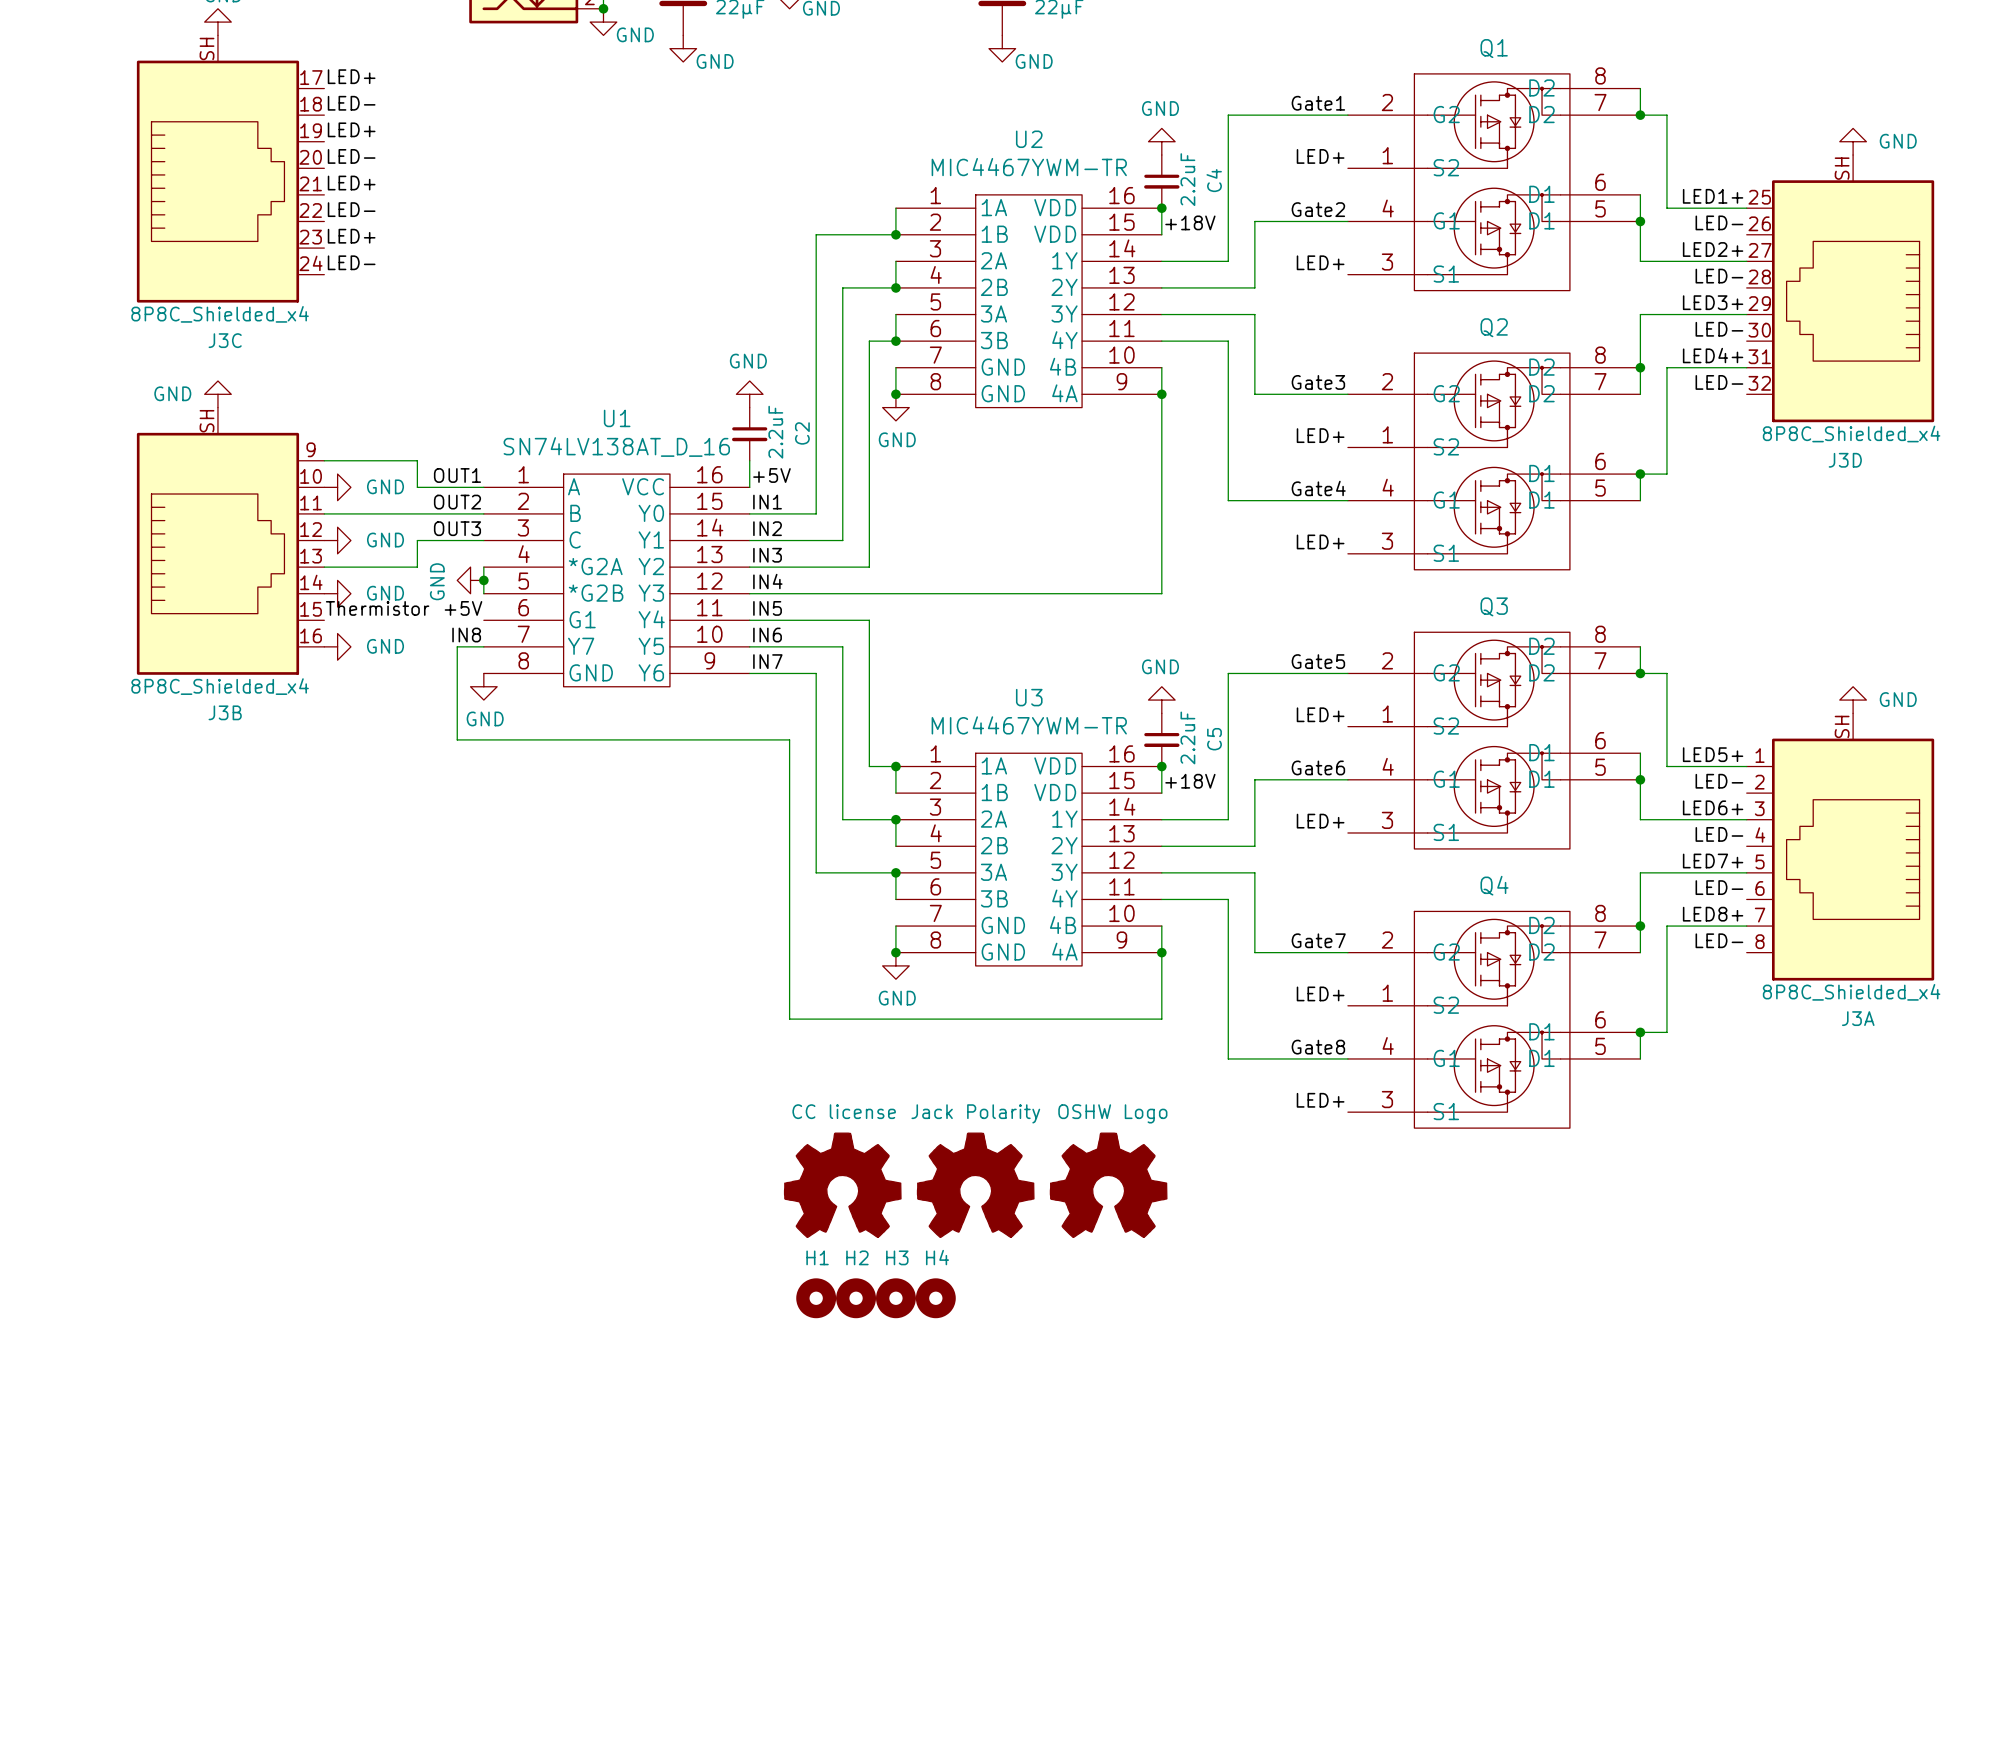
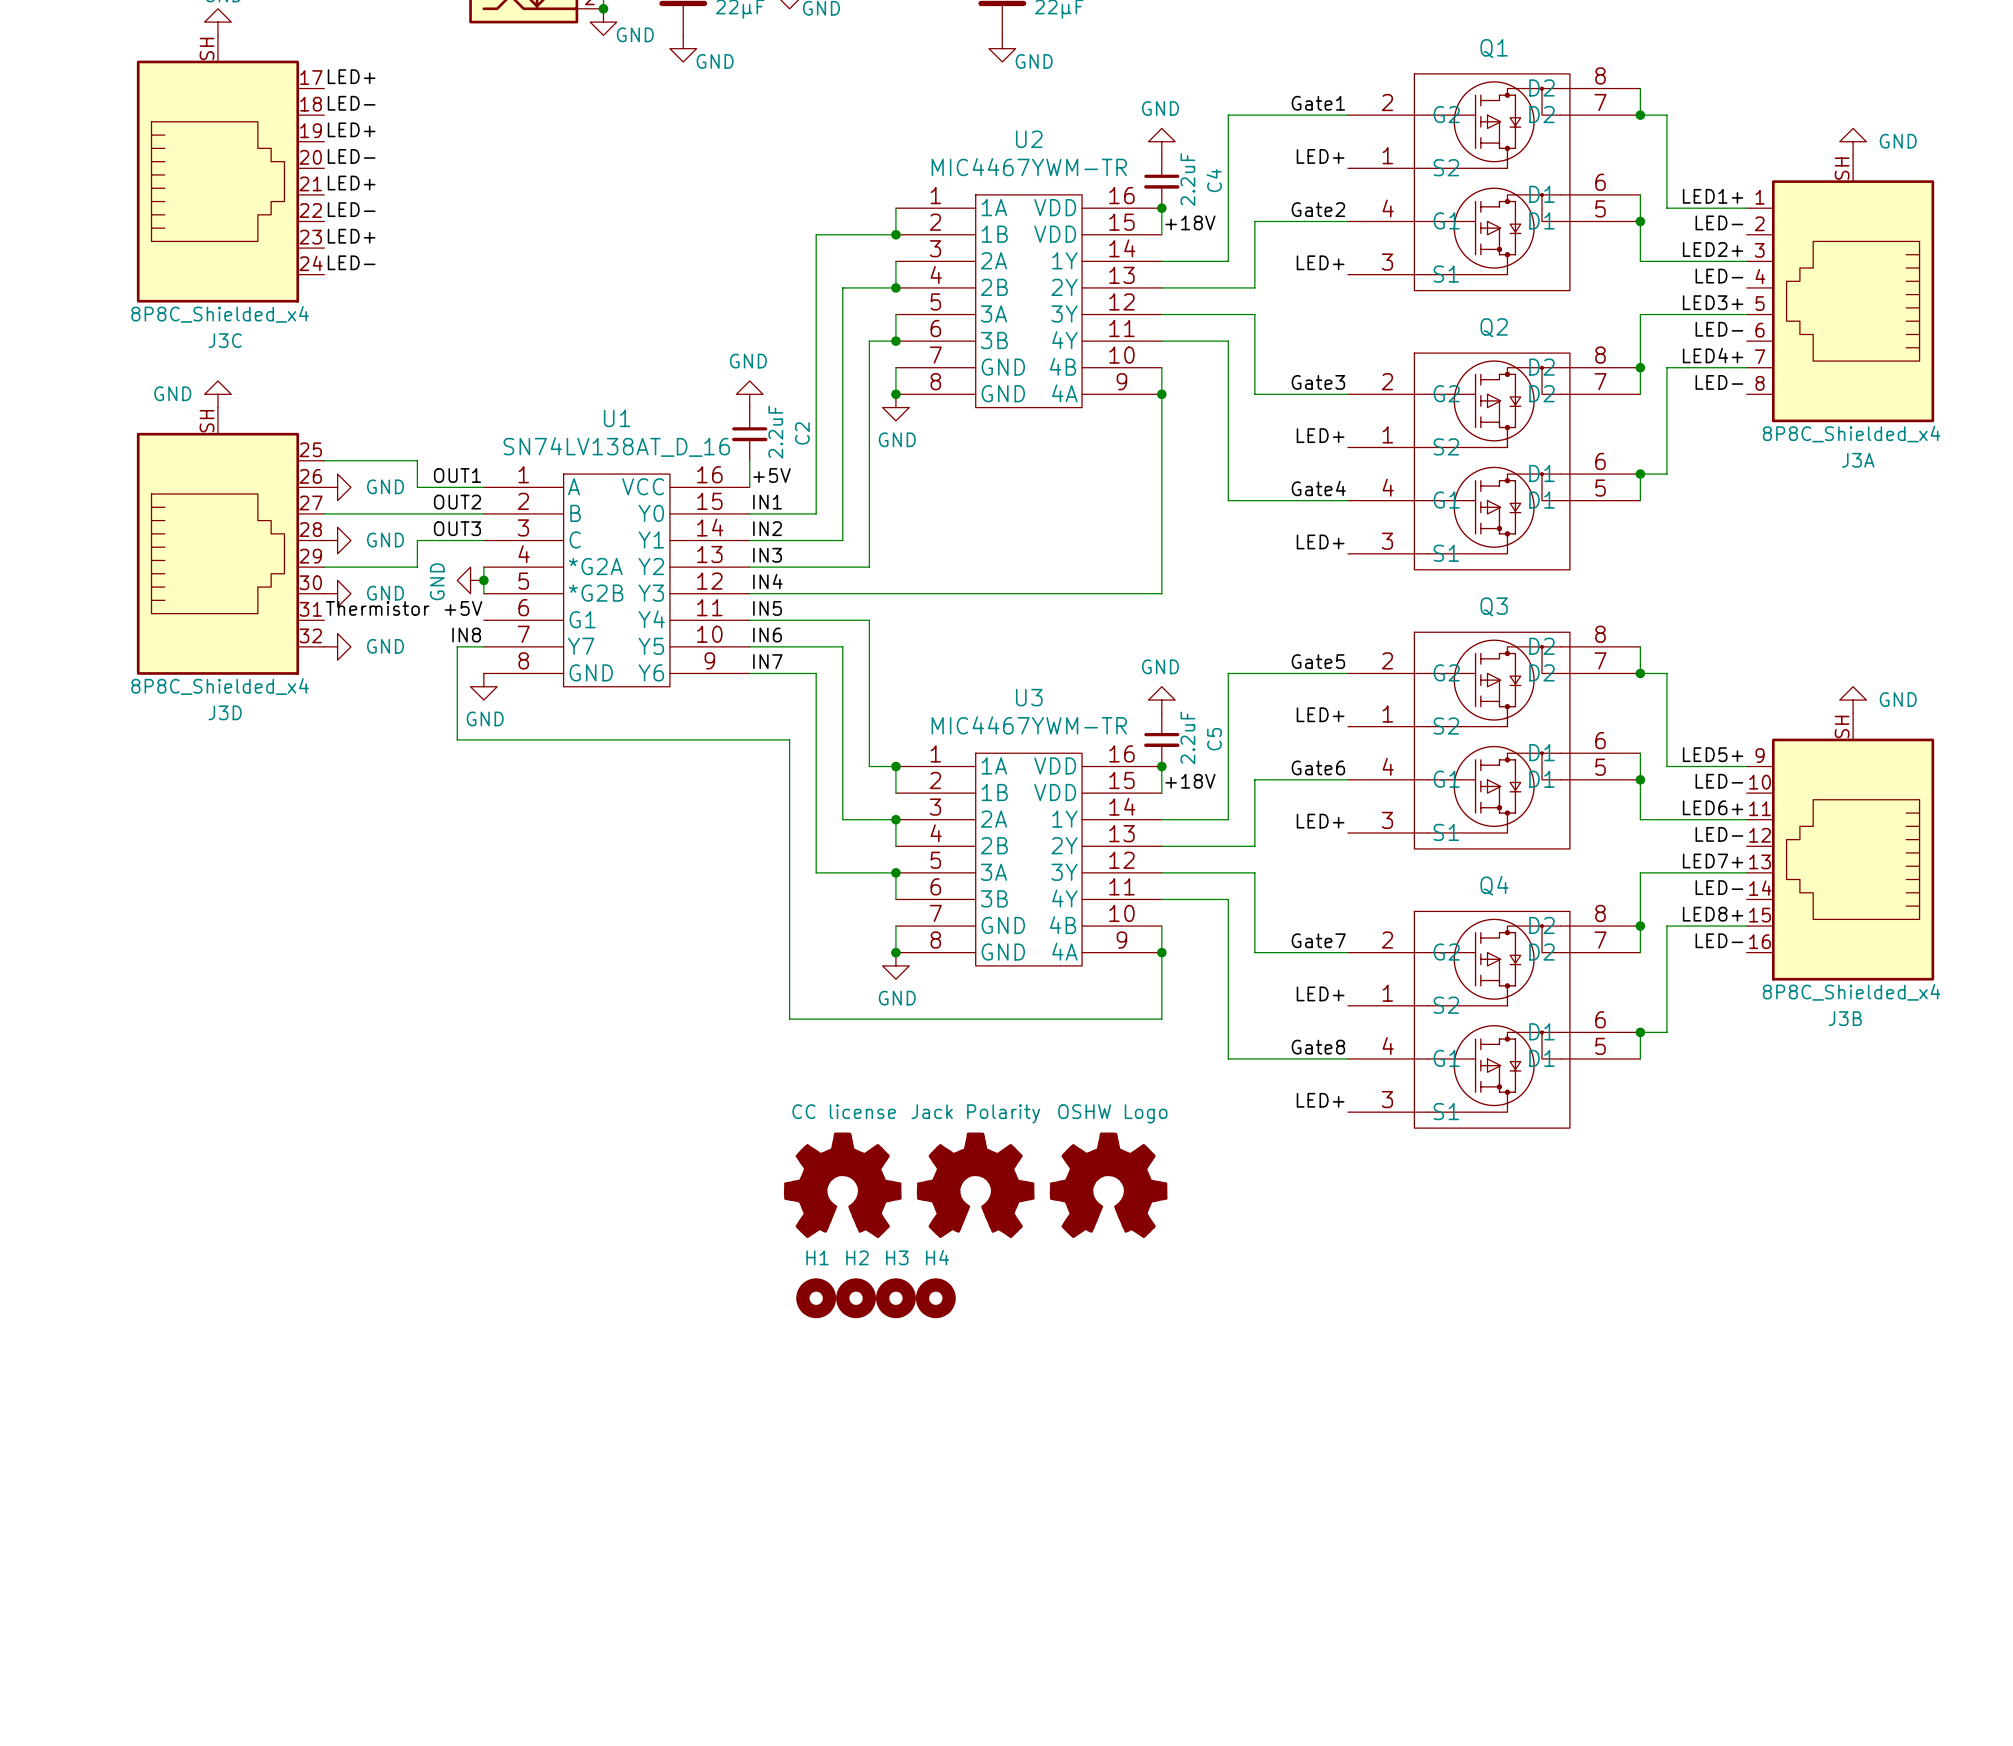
J3D position: (1840, 288) -> (230, 541)
J3D flip: as is (1853, 301) -> left-right (217, 553)
J3B position: (230, 541) -> (1840, 846)
J3B flip: as is (217, 553) -> left-right (1853, 859)
J3A position: (1840, 846) -> (1840, 288)

